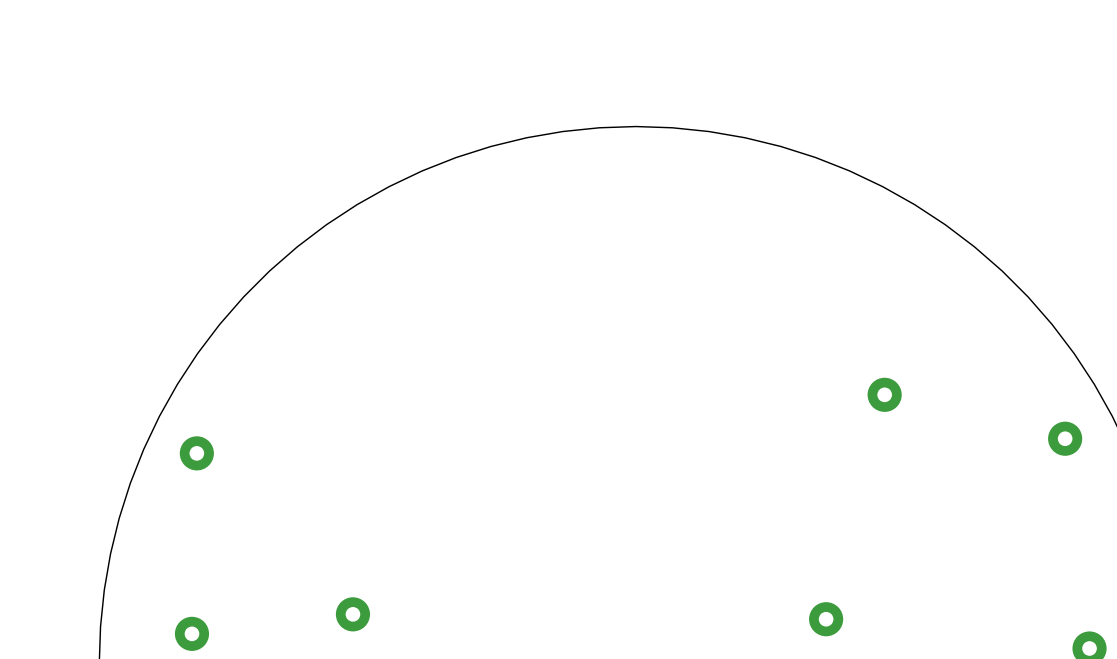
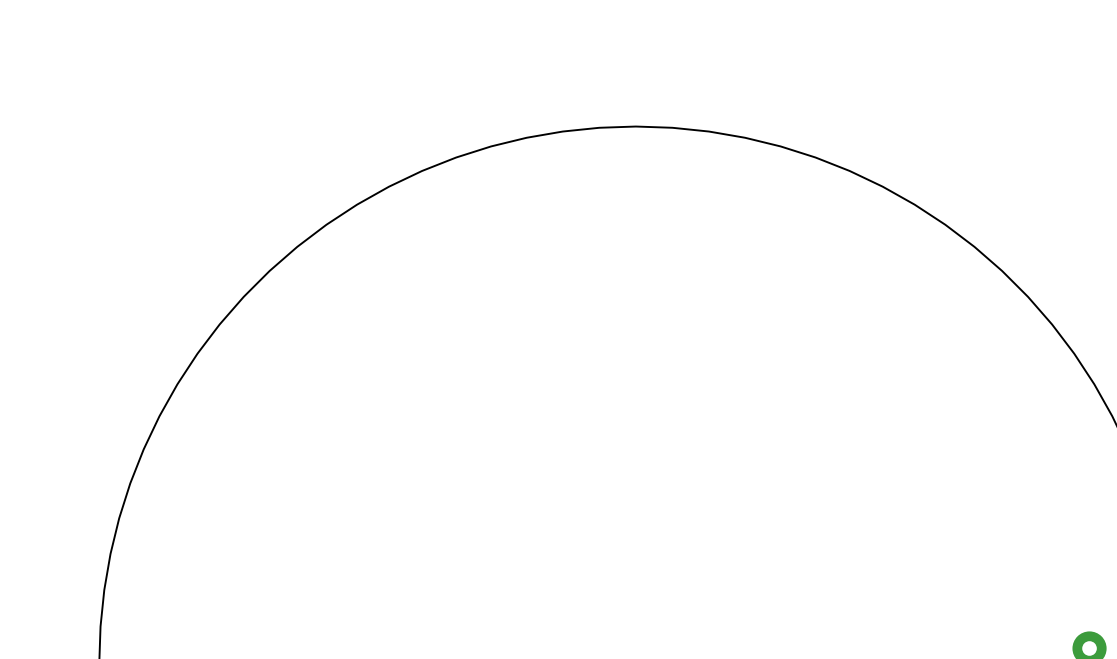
via: (884, 394) -> none
via: (1065, 438) -> none
via: (196, 453) -> none
via: (352, 614) -> none
via: (826, 619) -> none
via: (191, 633) -> none

